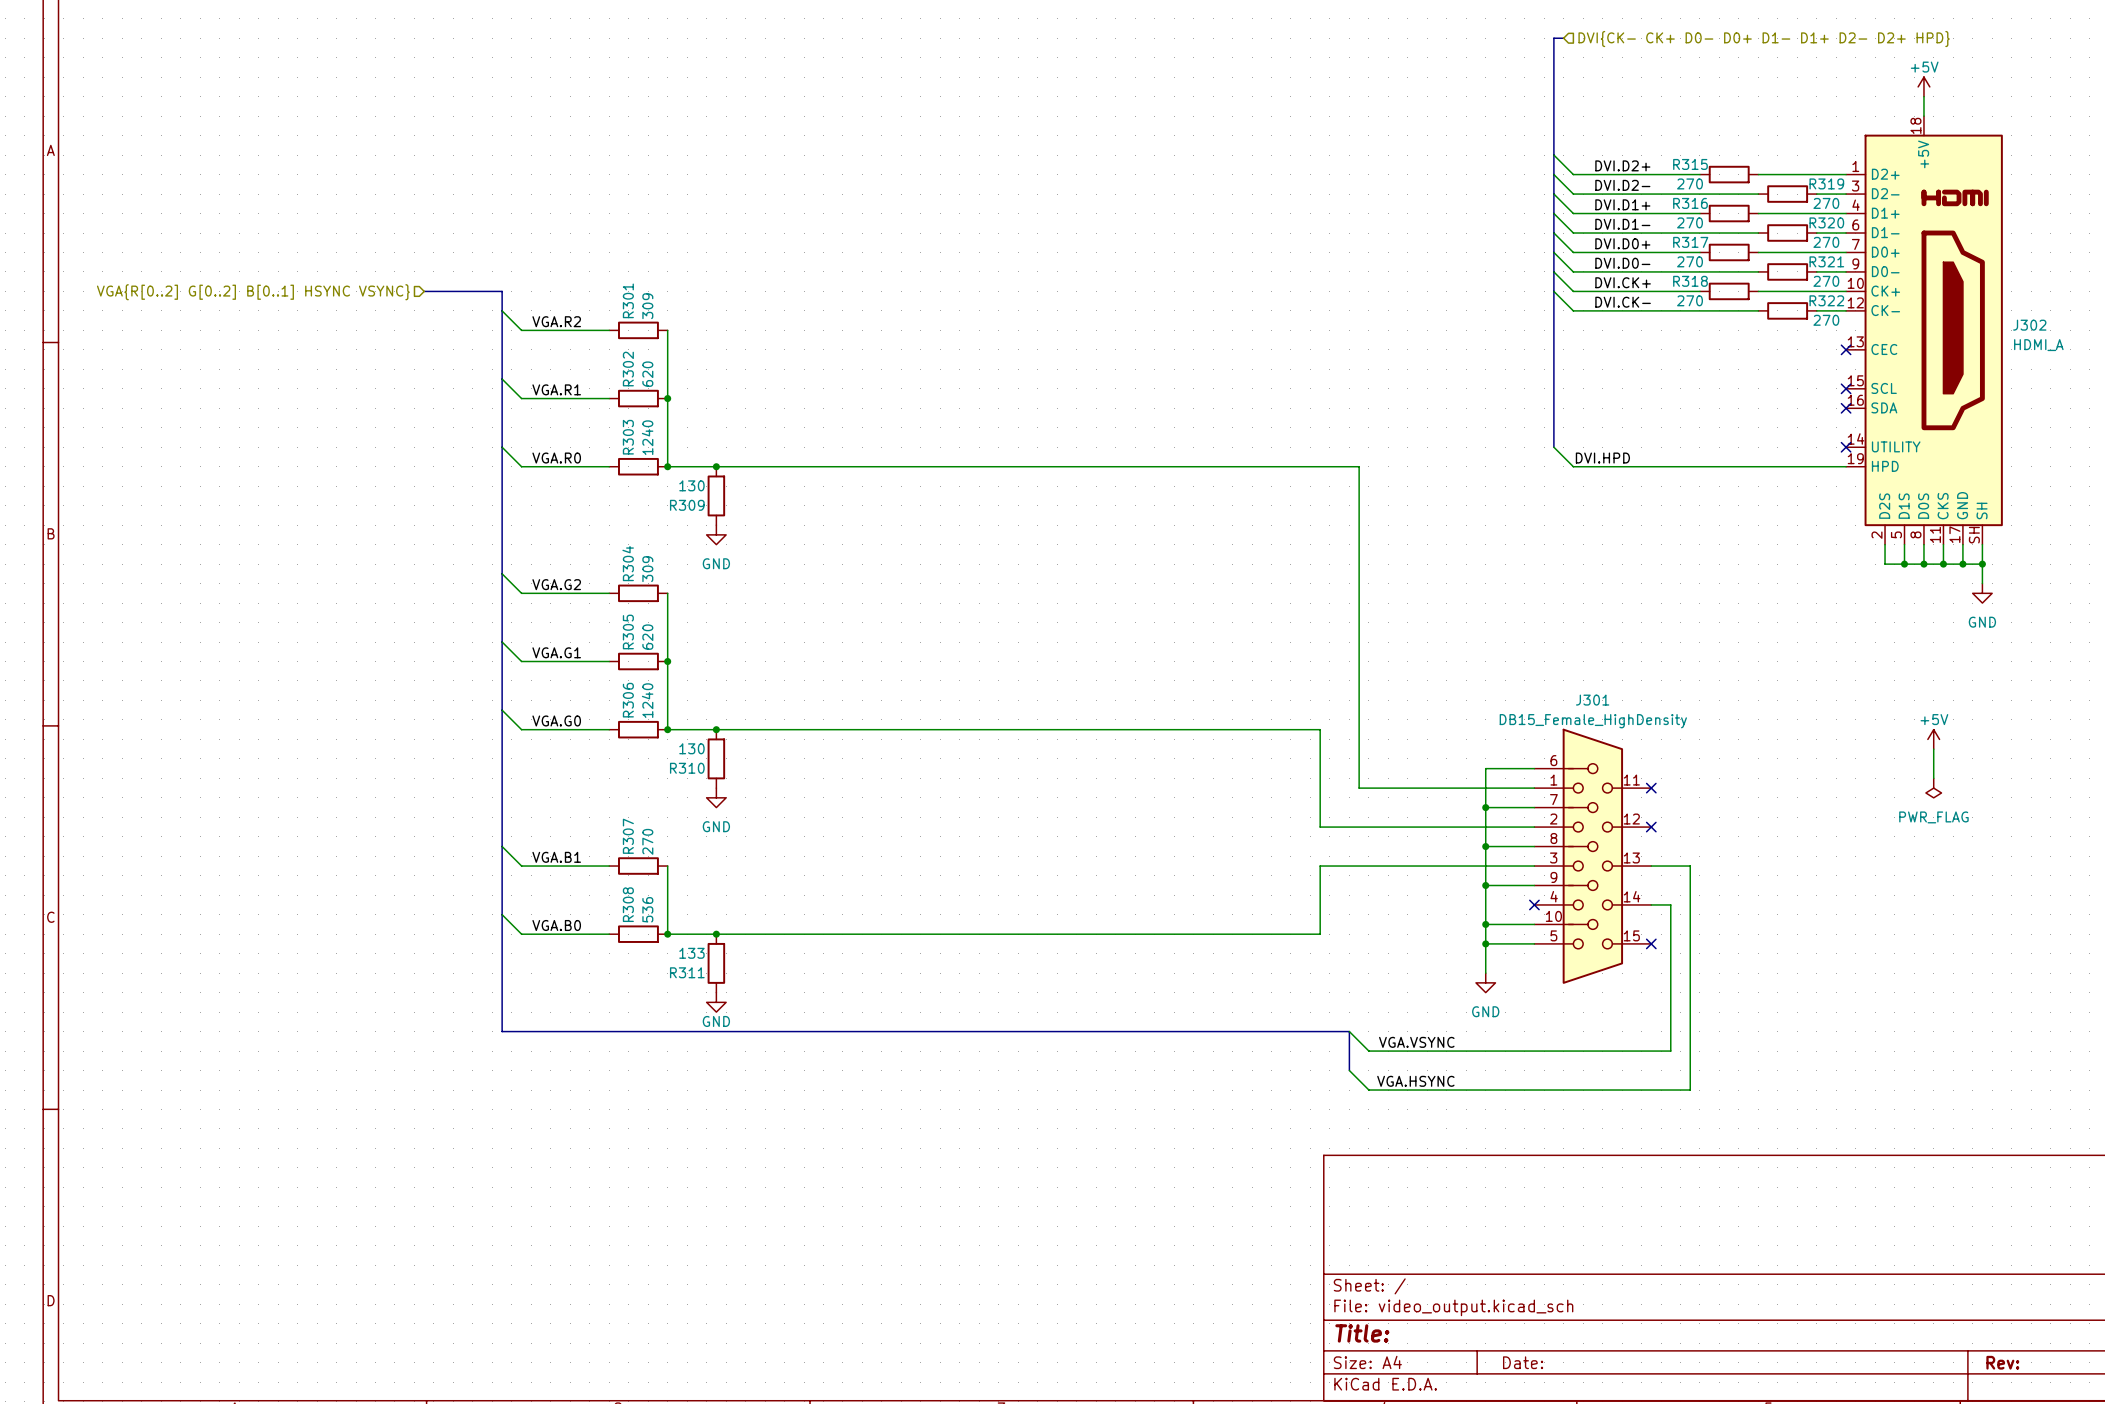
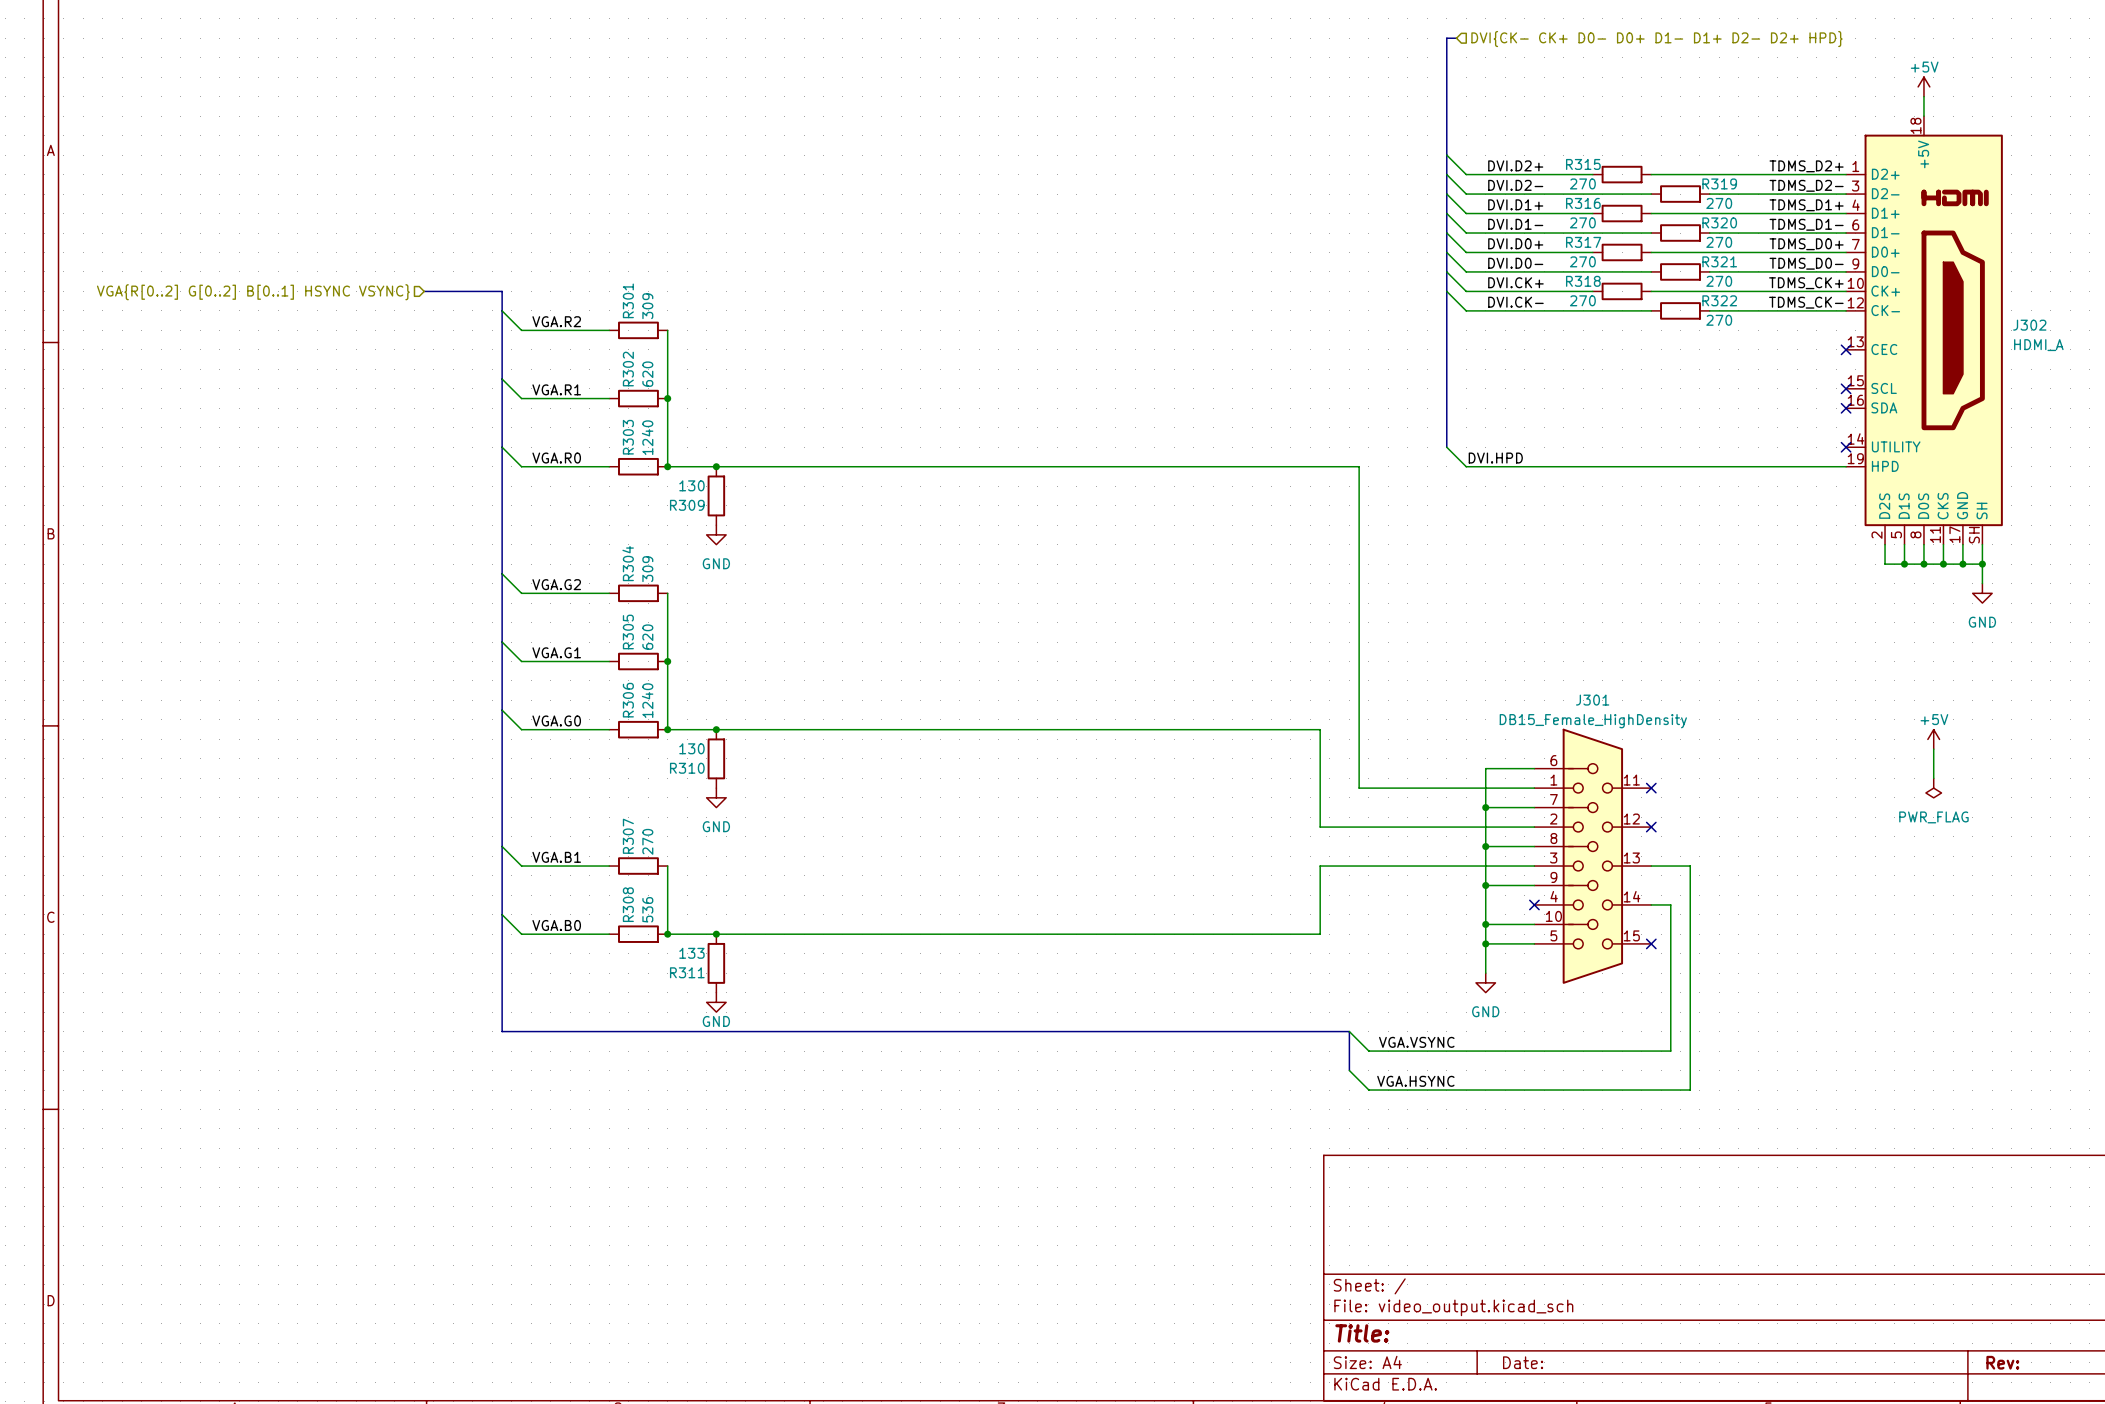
bus: (1563, 38) (1553, 38) (1553, 447) -> (1456, 38) (1446, 38) (1446, 447)
hierarchical label position: DVI{CK- CK+ D0- D0+ D1- D1+ D2- D2+ HPD} (1764, 39) -> DVI{CK- CK+ D0- D0+ D1- D1+ D2- D2+ HPD} (1657, 39)
wire: (1553, 155) (1573, 174) -> (1446, 155) (1466, 174) (1573, 174)
label position: DVI.D2+ (1622, 165) -> DVI.D2+ (1515, 165)
label: none -> TDMS_D2+ (1806, 166)
wire: (1553, 174) (1573, 194) -> (1446, 174) (1466, 194) (1573, 194)
wire: (1592, 174) (1651, 174) -> (1699, 174) (1758, 174)
R315 position: (1729, 174) -> (1622, 174)
label position: DVI.D2- (1622, 185) -> DVI.D2- (1515, 185)
label: none -> TDMS_D2- (1806, 185)
wire: (1553, 194) (1573, 213) -> (1446, 194) (1466, 213) (1573, 213)
wire: (1651, 194) (1709, 194) -> (1758, 194) (1816, 194)
R319 position: (1787, 194) -> (1680, 194)
label position: DVI.D1+ (1622, 204) -> DVI.D1+ (1515, 204)
label: none -> TDMS_D1+ (1806, 205)
wire: (1553, 213) (1573, 233) -> (1446, 213) (1466, 233) (1573, 233)
wire: (1592, 213) (1651, 213) -> (1699, 213) (1758, 213)
R316 position: (1729, 213) -> (1622, 213)
label position: DVI.D1- (1622, 224) -> DVI.D1- (1515, 224)
label: none -> TDMS_D1- (1806, 224)
wire: (1553, 233) (1573, 252) -> (1446, 233) (1466, 252) (1573, 252)
wire: (1651, 233) (1709, 233) -> (1758, 233) (1816, 233)
R320 position: (1787, 233) -> (1680, 233)
label position: DVI.D0+ (1622, 243) -> DVI.D0+ (1515, 243)
label: none -> TDMS_D0+ (1806, 244)
wire: (1553, 252) (1573, 271) -> (1446, 252) (1466, 271) (1573, 271)
wire: (1592, 252) (1651, 252) -> (1699, 252) (1758, 252)
R317 position: (1729, 252) -> (1622, 252)
label position: DVI.D0- (1622, 263) -> DVI.D0- (1515, 263)
label: none -> TDMS_D0- (1806, 263)
wire: (1553, 271) (1573, 291) -> (1446, 271) (1466, 291) (1573, 291)
wire: (1651, 271) (1709, 271) -> (1758, 271) (1816, 271)
R321 position: (1787, 271) -> (1680, 271)
label position: DVI.CK+ (1623, 282) -> DVI.CK+ (1515, 282)
label: none -> TDMS_CK+ (1806, 283)
wire: (1553, 291) (1573, 310) -> (1446, 291) (1466, 310) (1573, 310)
wire: (1592, 291) (1651, 291) -> (1699, 291) (1758, 291)
R318 position: (1729, 291) -> (1622, 291)
label position: DVI.CK- (1623, 302) -> DVI.CK- (1515, 302)
label: none -> TDMS_CK- (1806, 302)
wire: (1651, 310) (1709, 310) -> (1758, 310) (1816, 310)
R322 position: (1787, 310) -> (1680, 310)
wire: (1553, 447) (1573, 466) -> (1446, 447) (1466, 466) (1573, 466)
label position: DVI.HPD (1602, 458) -> DVI.HPD (1495, 458)

